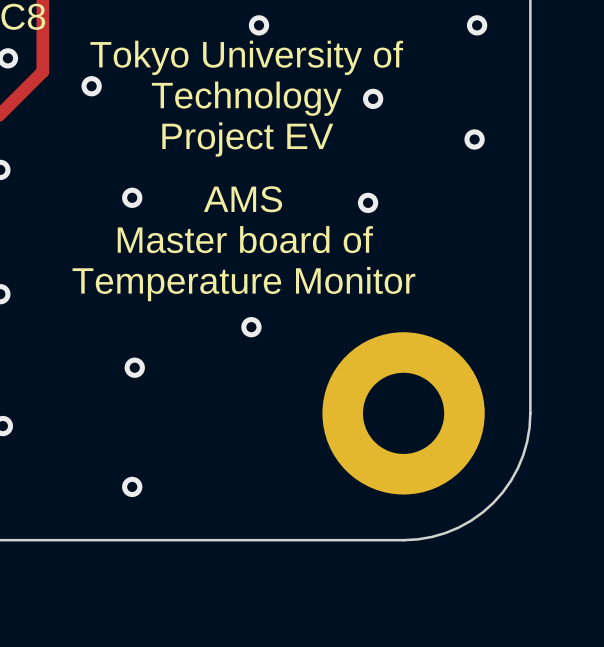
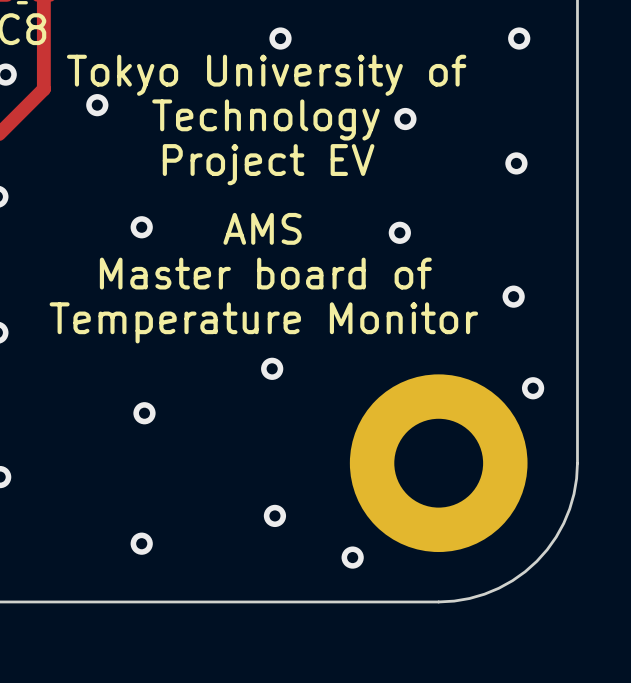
via: none -> (513, 296)
via: none -> (533, 388)
via: none -> (274, 515)
via: none -> (352, 557)

